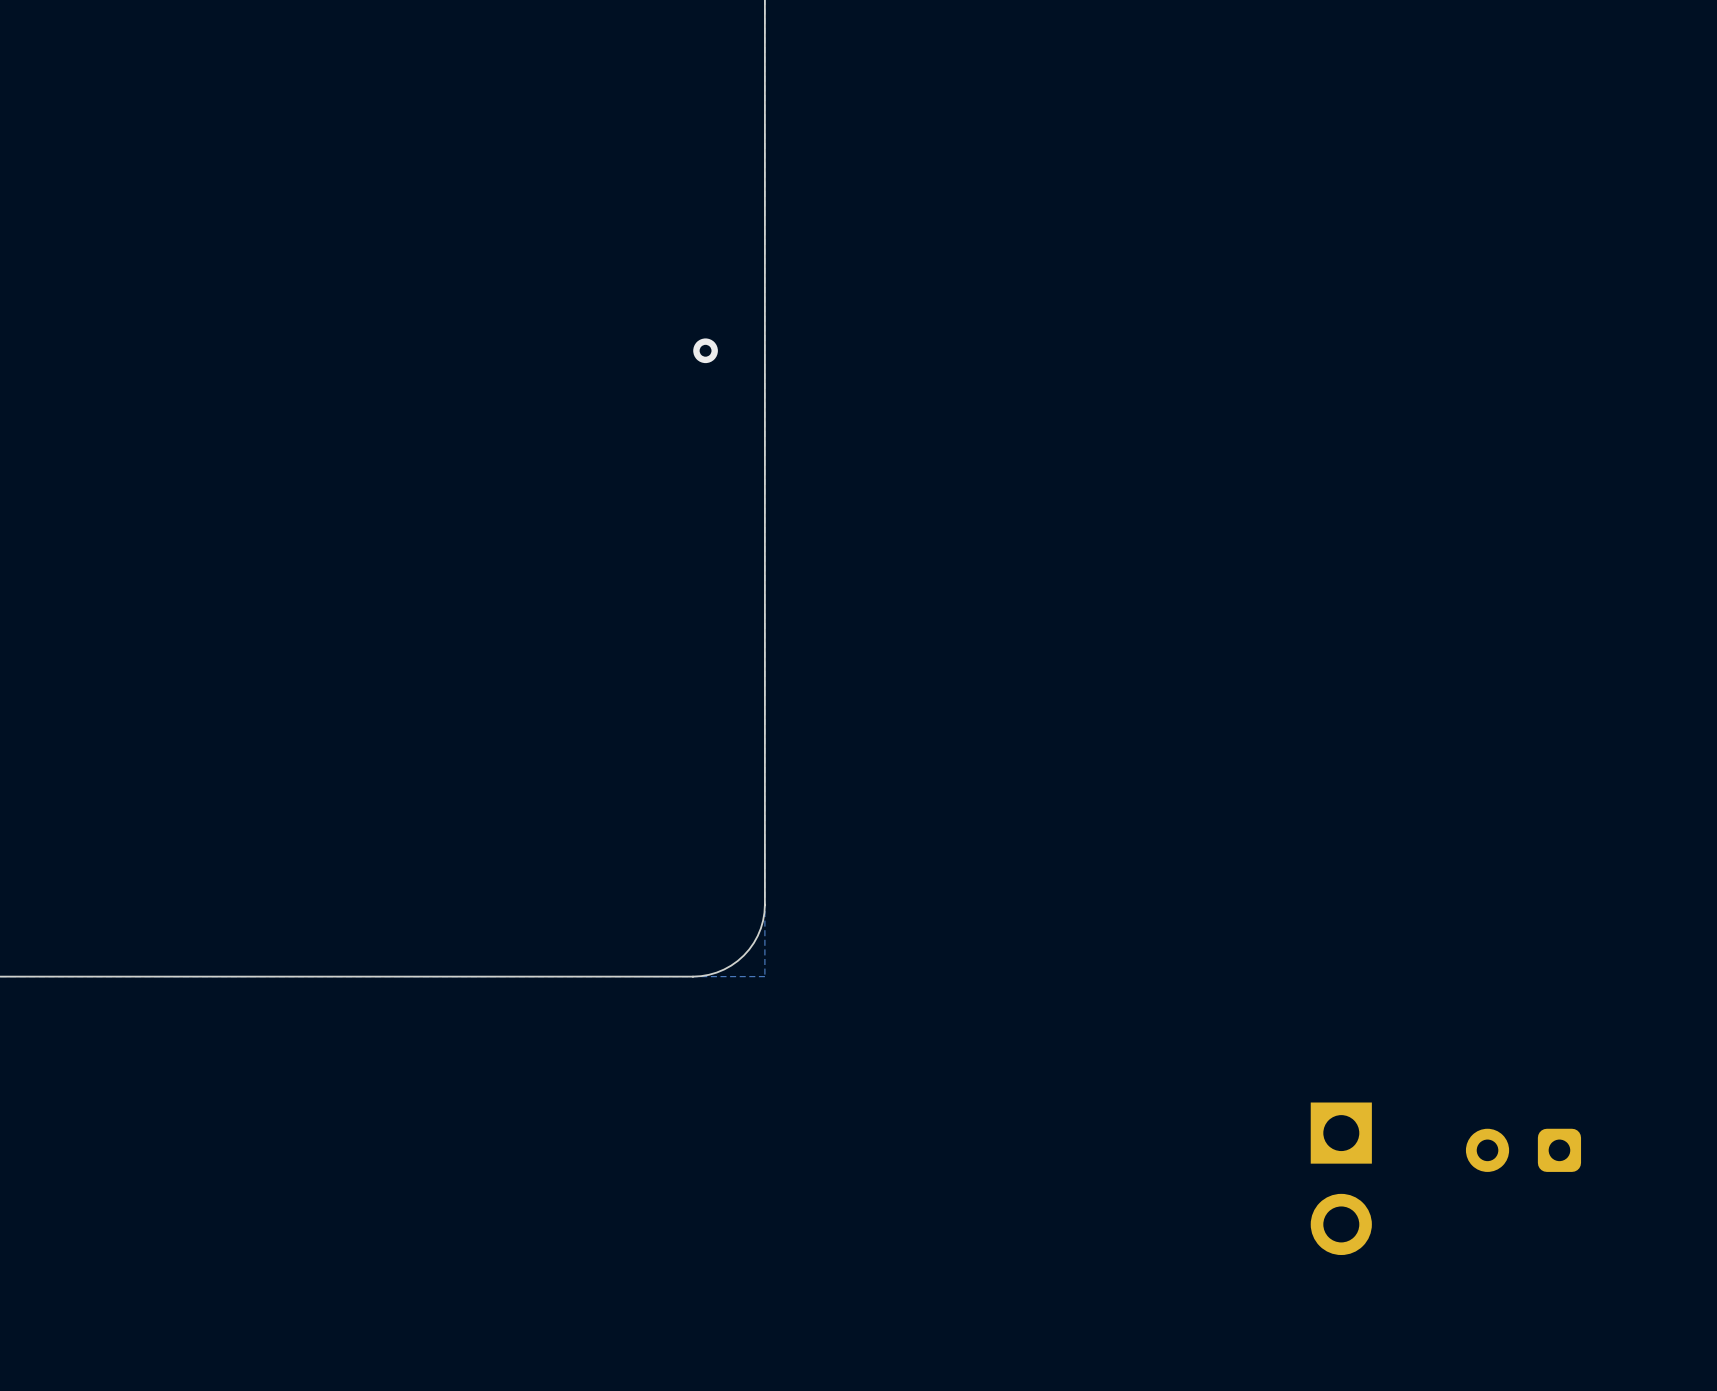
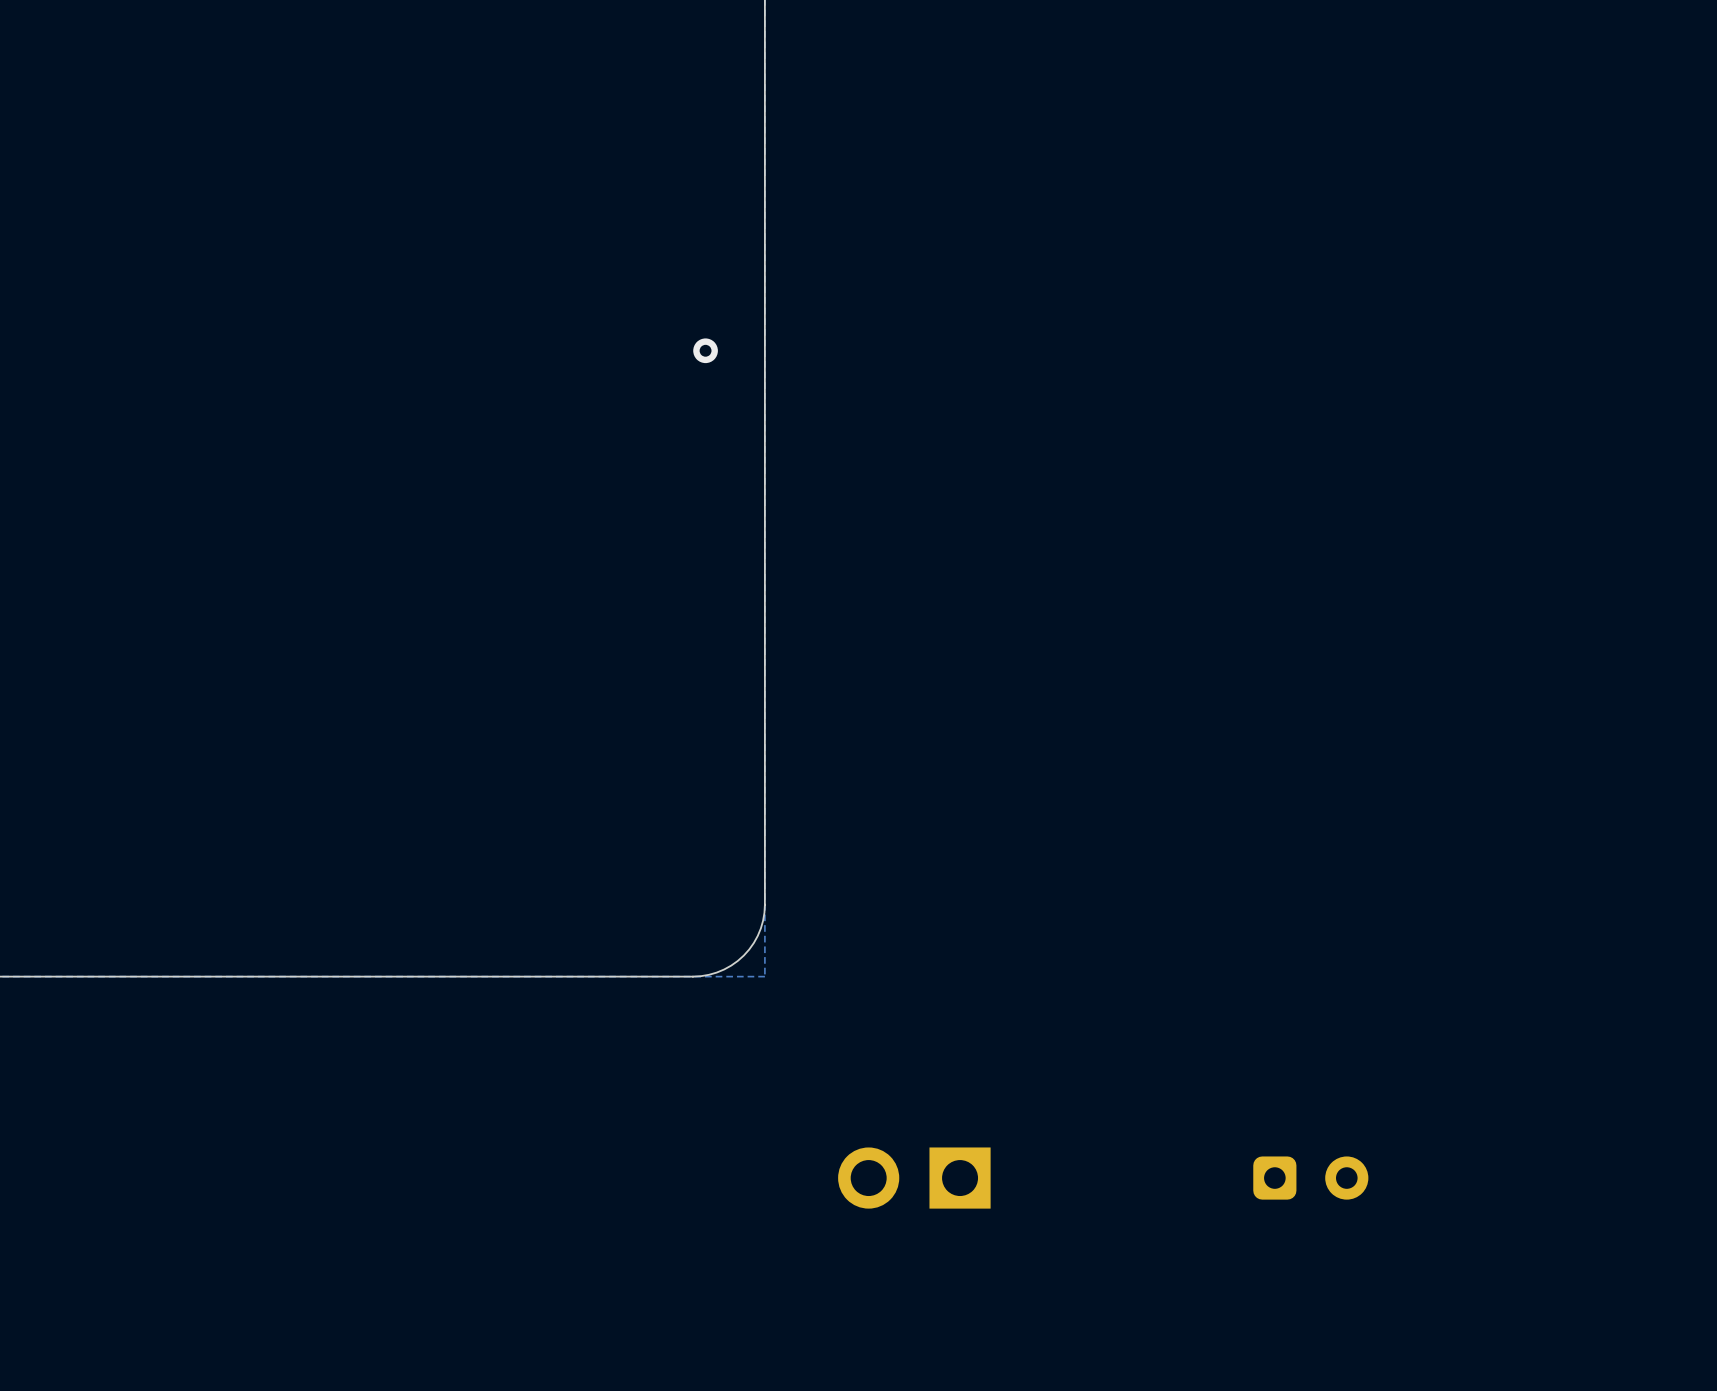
part footprint: [1310, 1102, 1372, 1256] -> [1253, 1156, 1369, 1200]
part: (1523, 1150) -> none
part: none -> (914, 1178)

